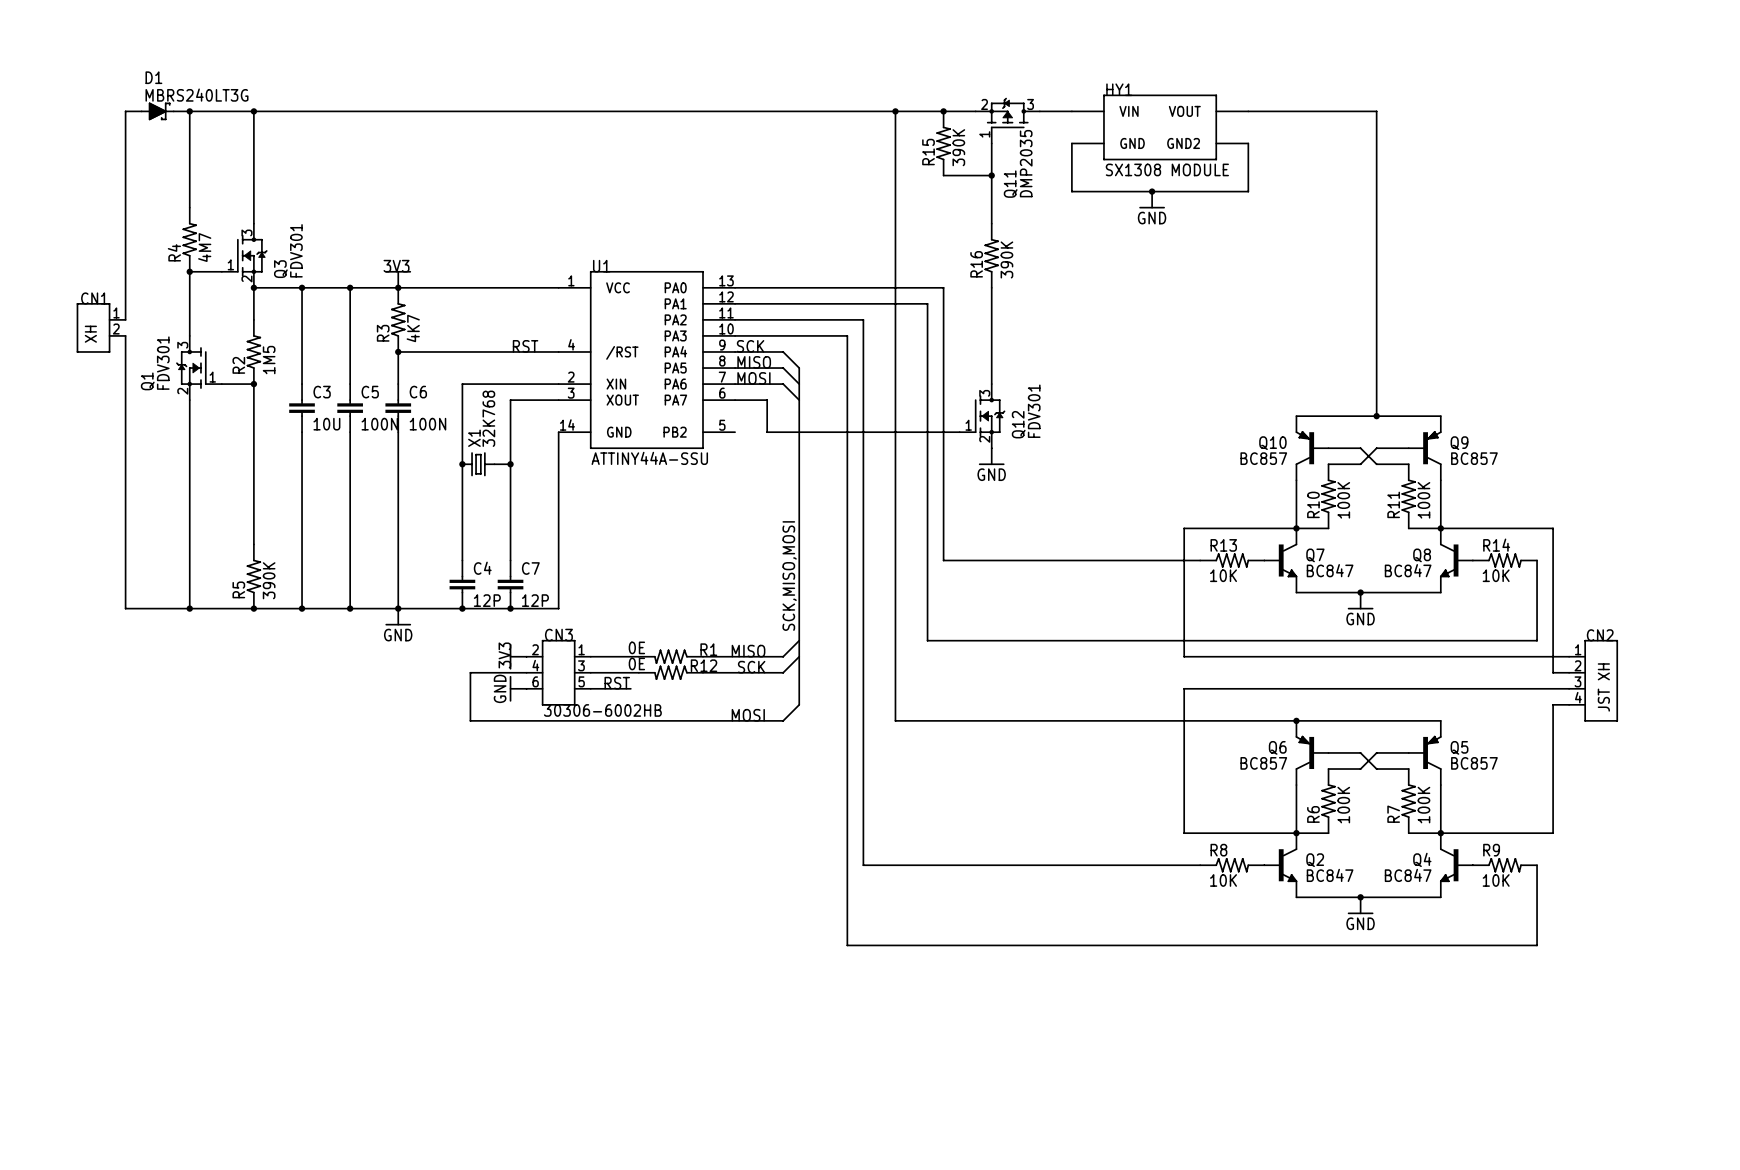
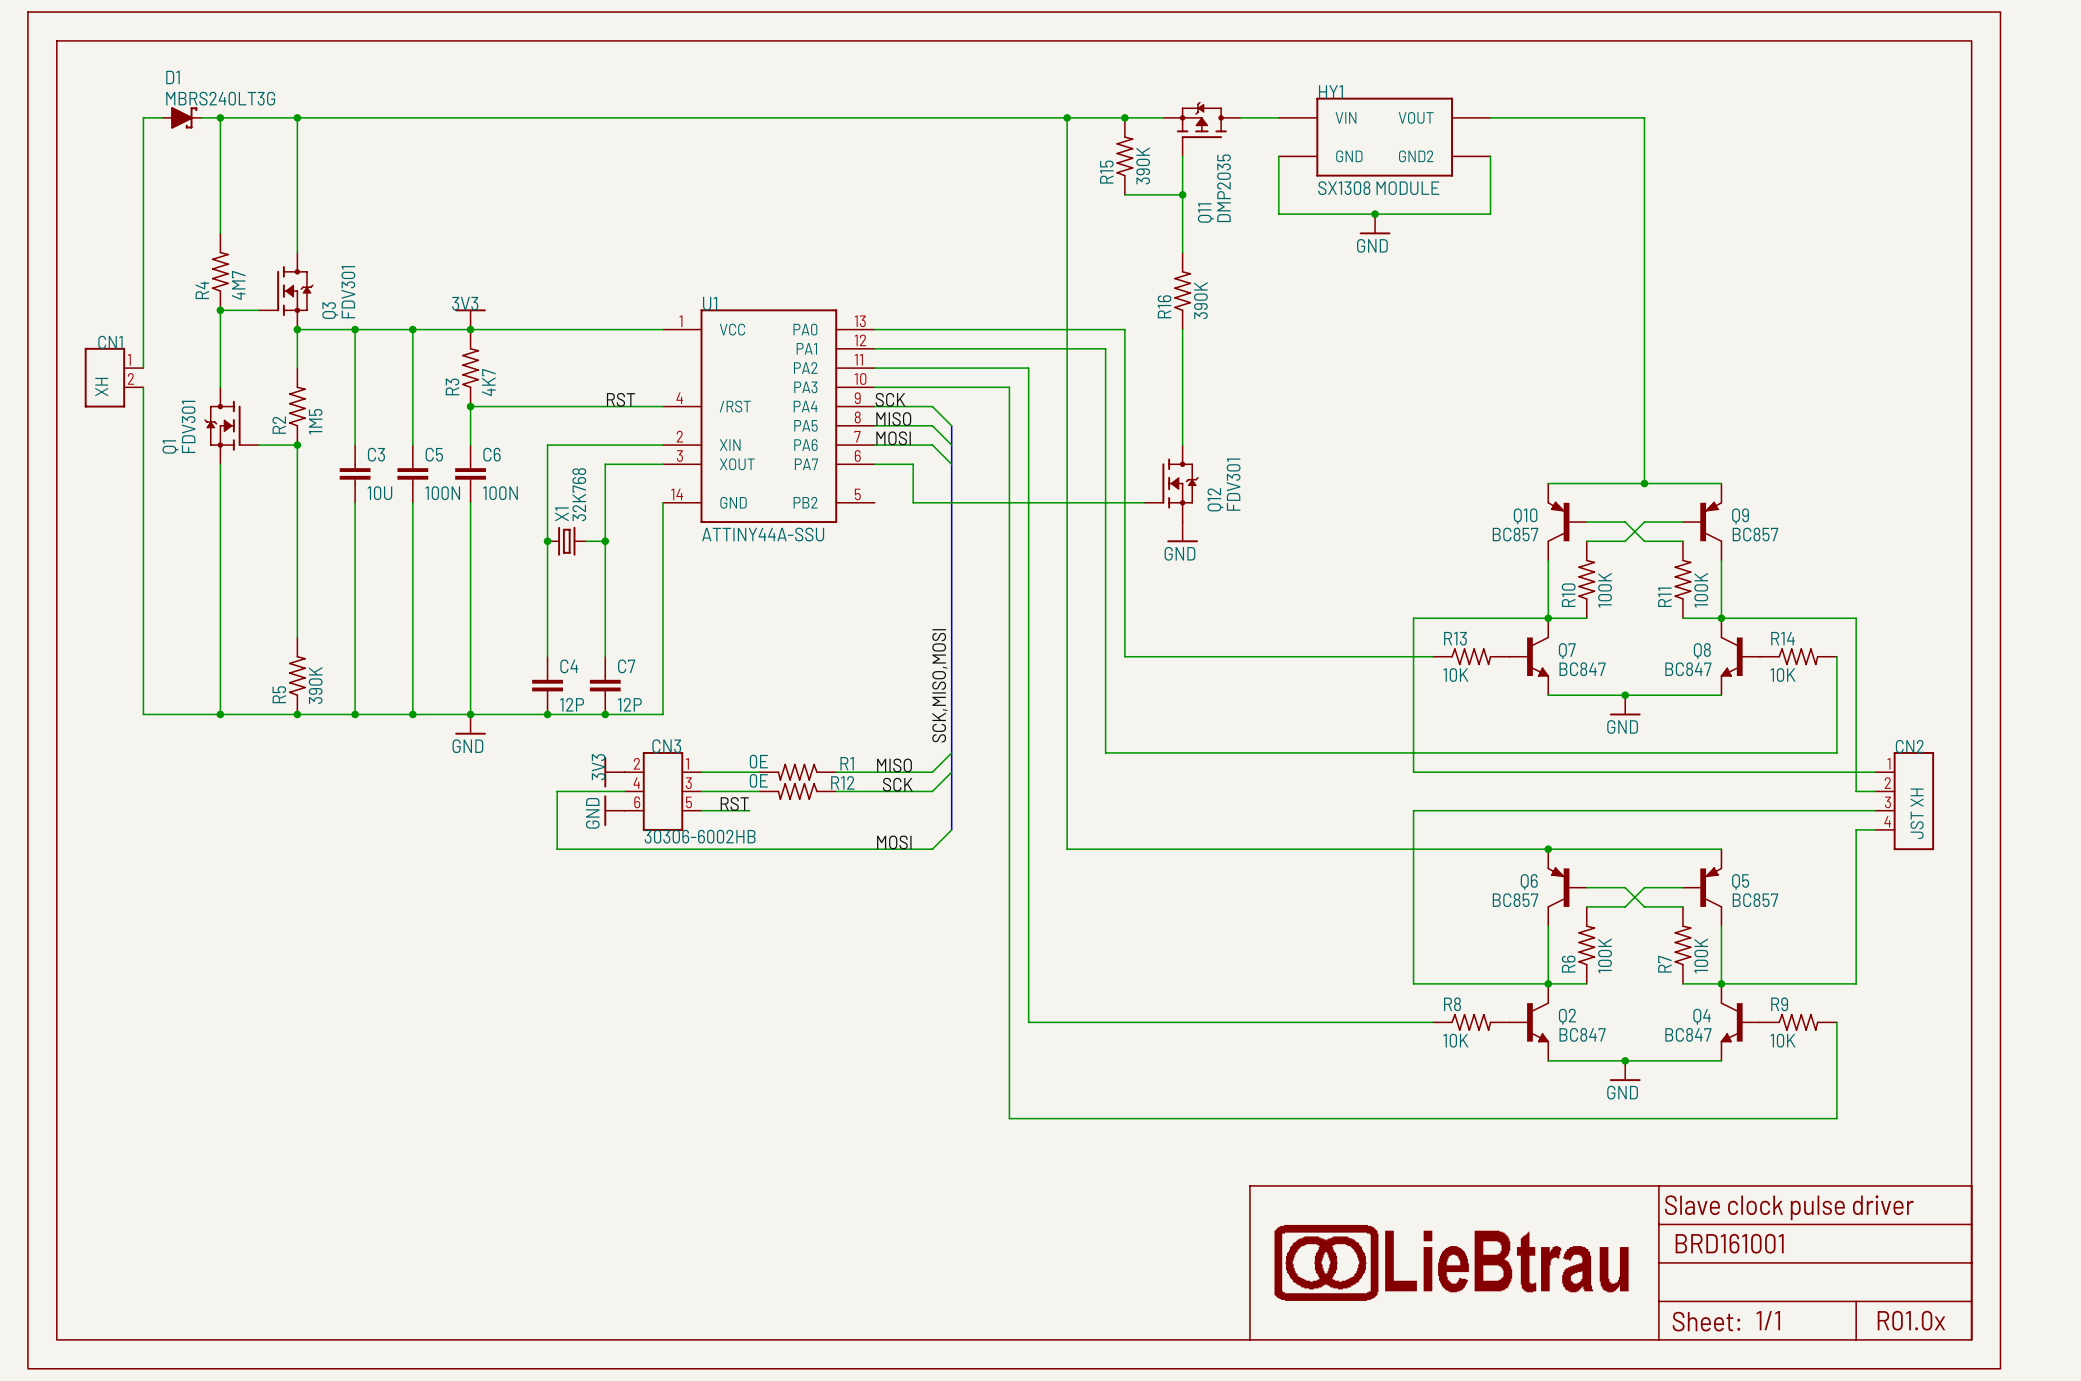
Q11 pin number: 2 (984, 104) -> none
Q11 pin number: 3 (1030, 104) -> none
Q11 pin number: 1 (984, 134) -> none
Q3 pin number: 3 (246, 232) -> none
Q3 pin number: 1 (230, 264) -> none
Q3 pin number: 2 (246, 278) -> none
Q1 pin number: 3 (182, 345) -> none
Q1 pin number: 1 (212, 377) -> none
Q1 pin number: 2 (182, 391) -> none
Q12 pin number: 3 (984, 393) -> none
Q12 pin number: 1 (968, 425) -> none
Q12 pin number: 2 (984, 439) -> none
part: none -> (1014, 690)

